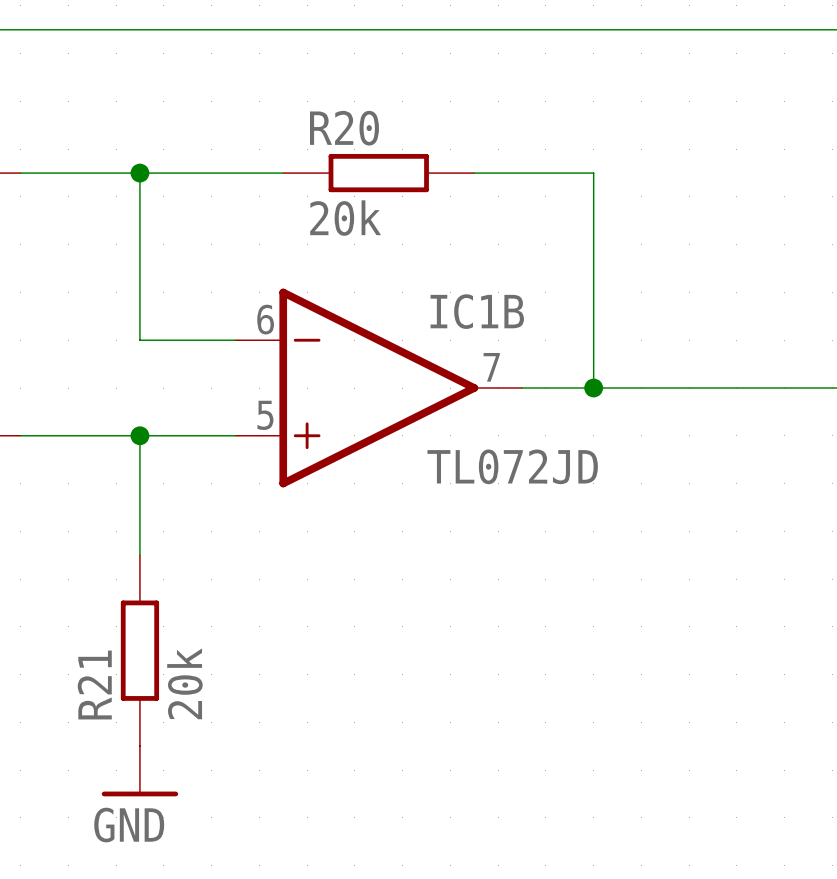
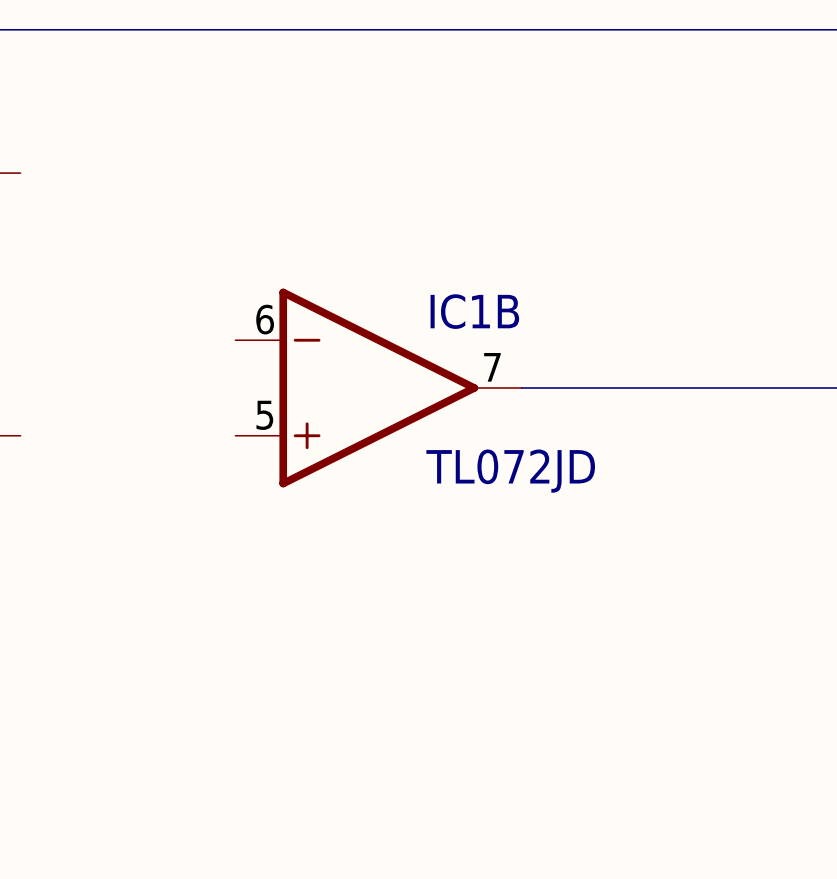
wire: (20, 173) (283, 173) -> none
wire: (139, 173) (139, 340) (235, 340) -> none
junction: (139, 173) -> none
R20: 20k (378, 173) -> none
wire: (474, 173) (593, 173) (593, 388) -> none
junction: (593, 388) -> none
wire: (20, 435) (235, 435) -> none
wire: (139, 435) (139, 555) -> none
junction: (139, 435) -> none
R21: 20k (139, 650) -> none
power symbol: GND (139, 771) -> none

